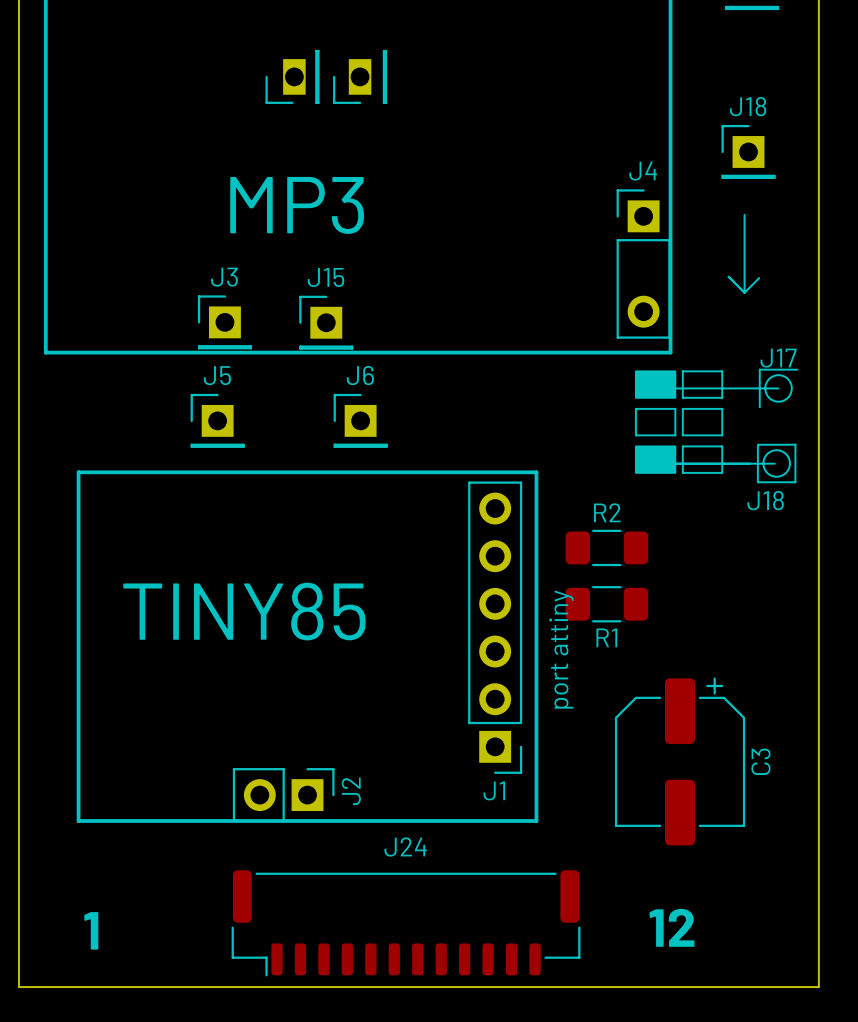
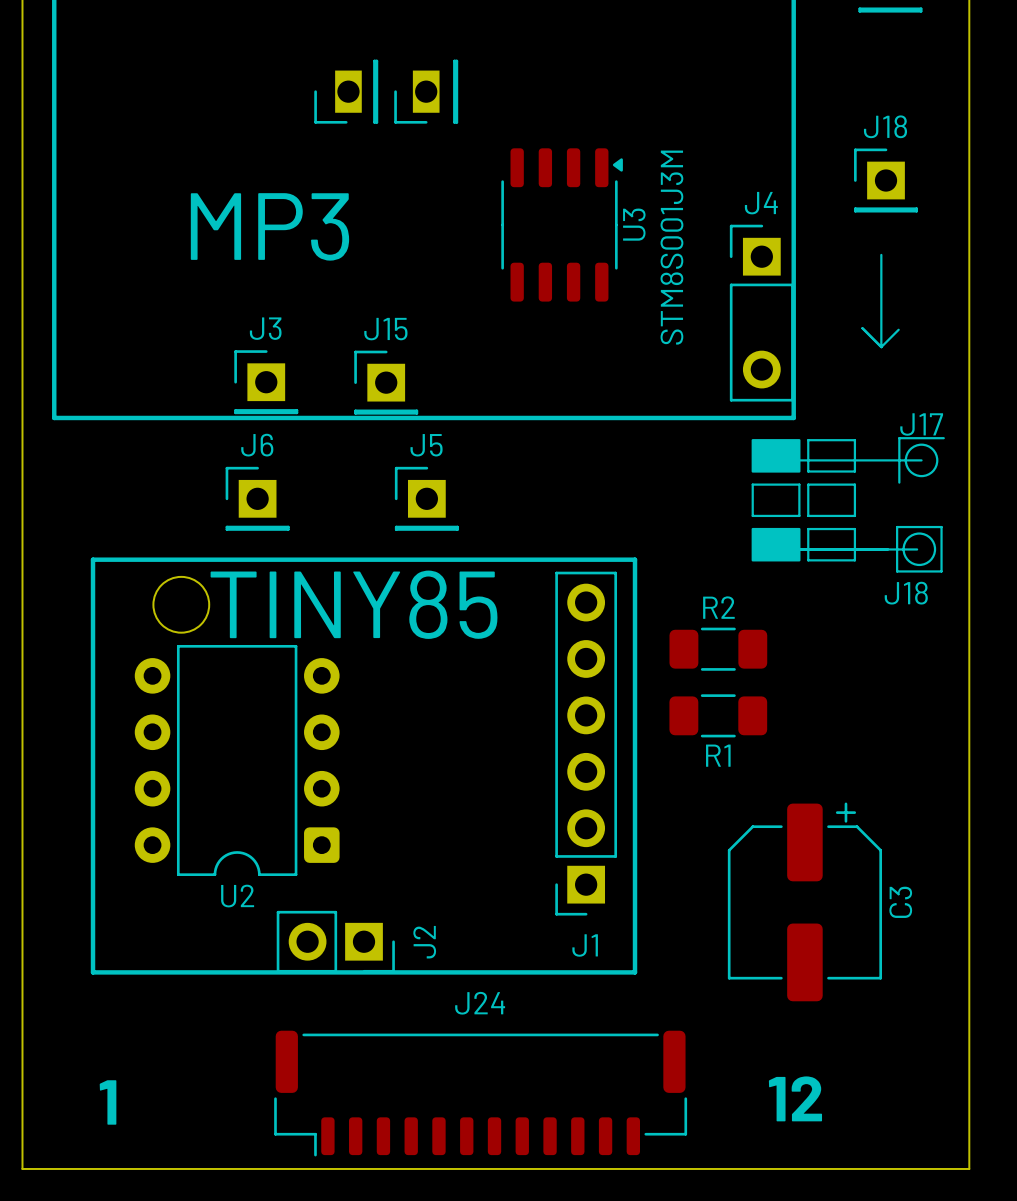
U3: none -> STM8S001J3M (562, 224)
text position: MP3 (297, 205) -> MP3 (269, 226)
J5 name: J5 (217, 375) -> J6 (257, 445)
J6 name: J6 (360, 375) -> J5 (426, 445)
J1 footprint: [468, 481, 523, 774] -> [555, 571, 618, 916]
round board edge: none -> [152, 576, 210, 634]
text position: TINY85 (244, 611) -> TINY85 (354, 604)
U2: none -> (237, 760)
J1 value: port attiny (561, 649) -> none
J2 footprint: [232, 768, 335, 823] -> [276, 910, 395, 973]

